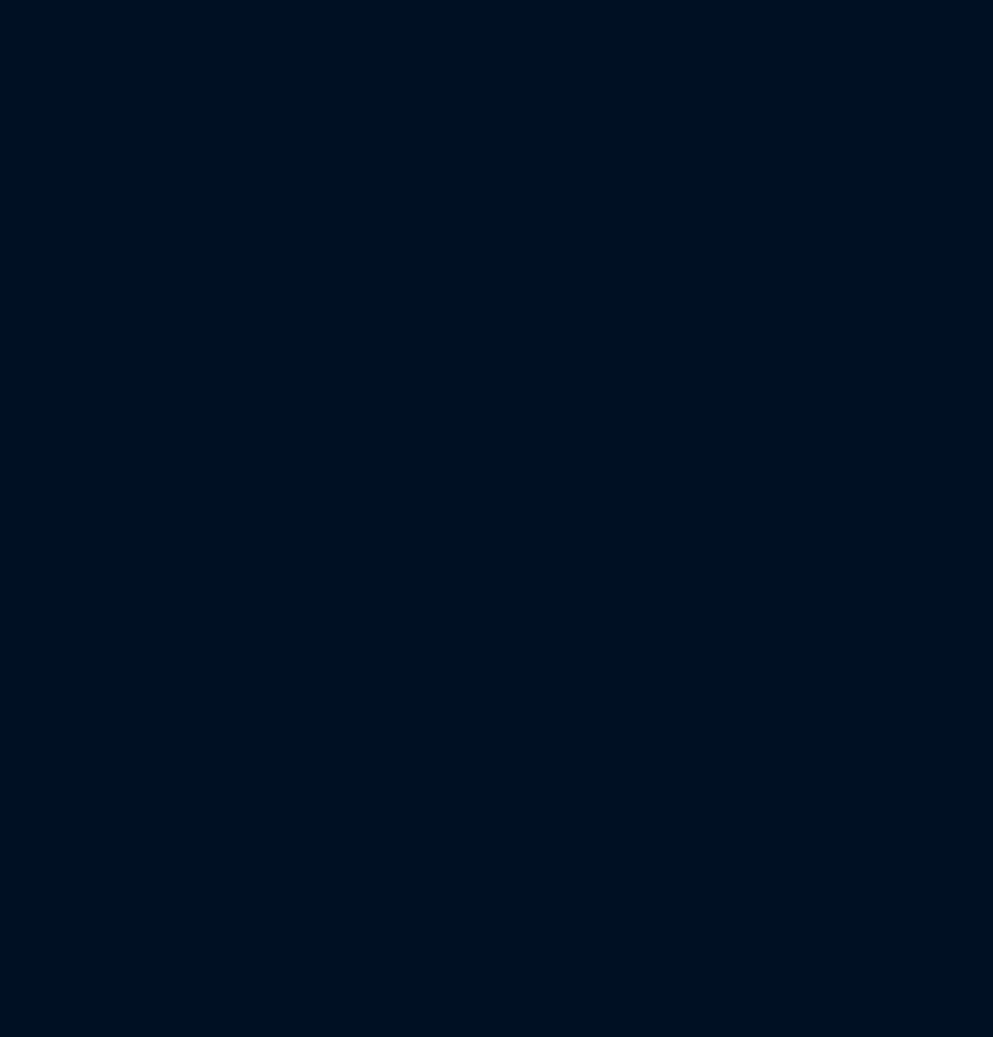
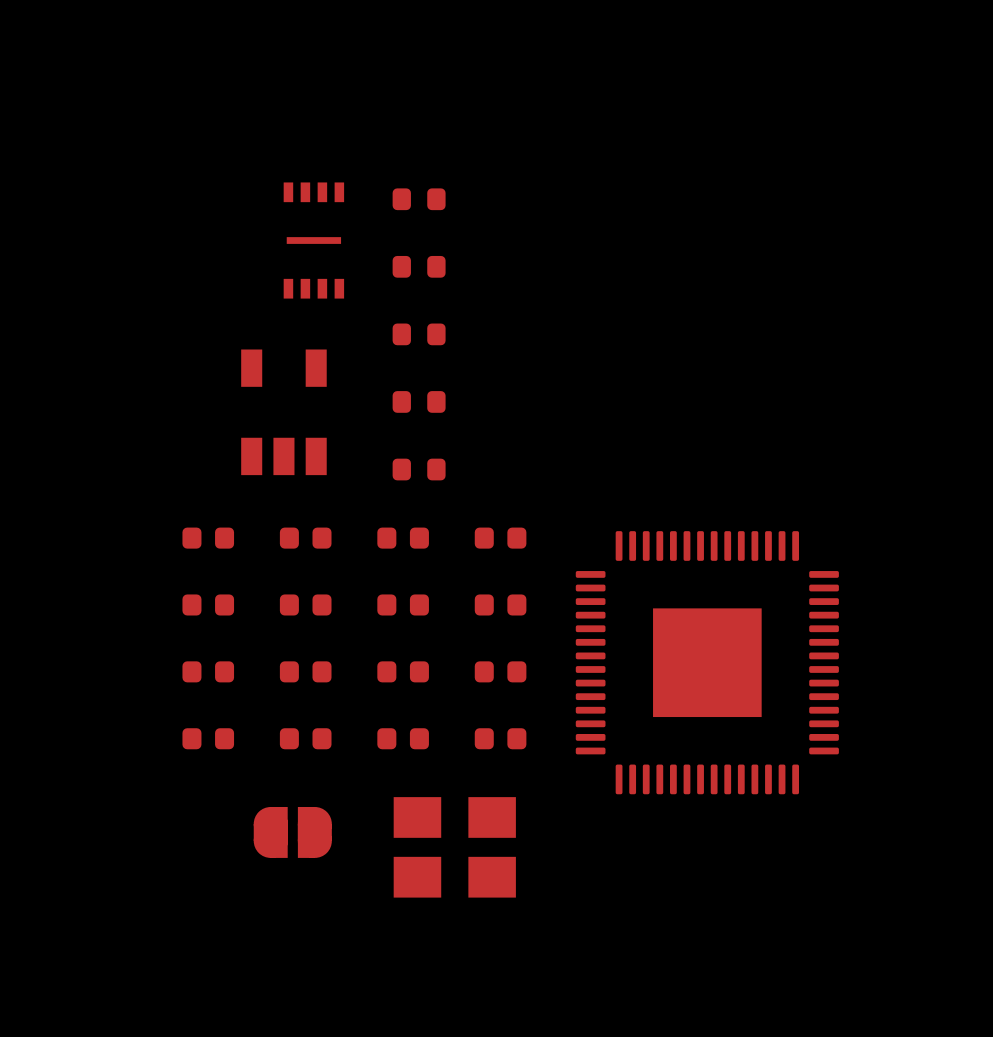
part: none -> (419, 199)
part: none -> (313, 240)
part: none -> (419, 266)
part: none -> (419, 334)
part: none -> (419, 401)
part: none -> (283, 412)
part: none -> (419, 469)
part: none -> (208, 538)
part: none -> (305, 538)
part: none -> (403, 538)
part: none -> (500, 538)
part: none -> (208, 604)
part: none -> (305, 604)
part: none -> (403, 604)
part: none -> (500, 604)
part: none -> (707, 662)
part: none -> (208, 671)
part: none -> (305, 671)
part: none -> (403, 671)
part: none -> (500, 671)
part: none -> (208, 738)
part: none -> (305, 738)
part: none -> (403, 738)
part: none -> (500, 738)
part: none -> (292, 832)
part: none -> (454, 847)

